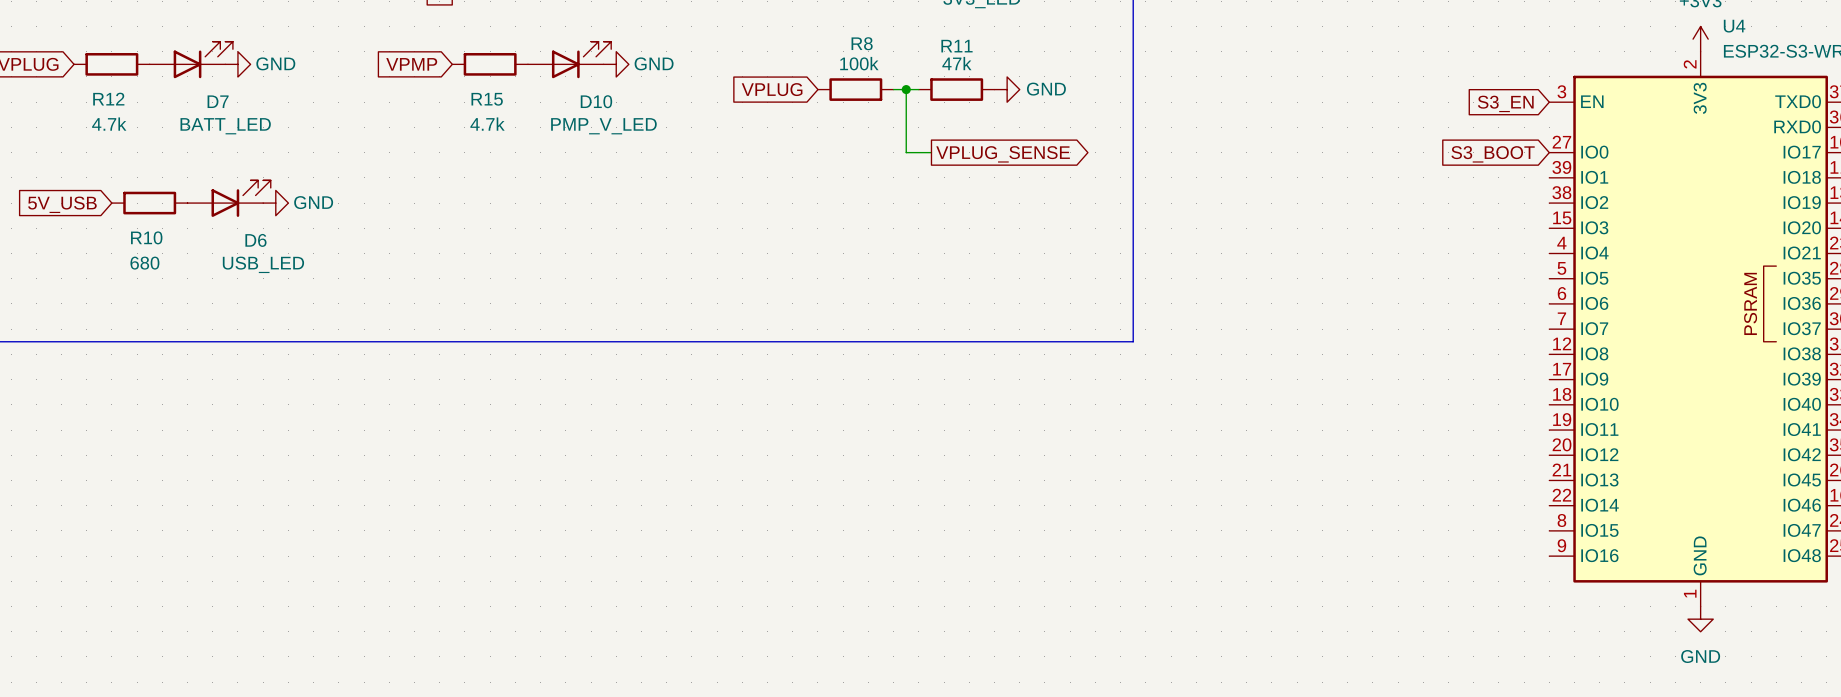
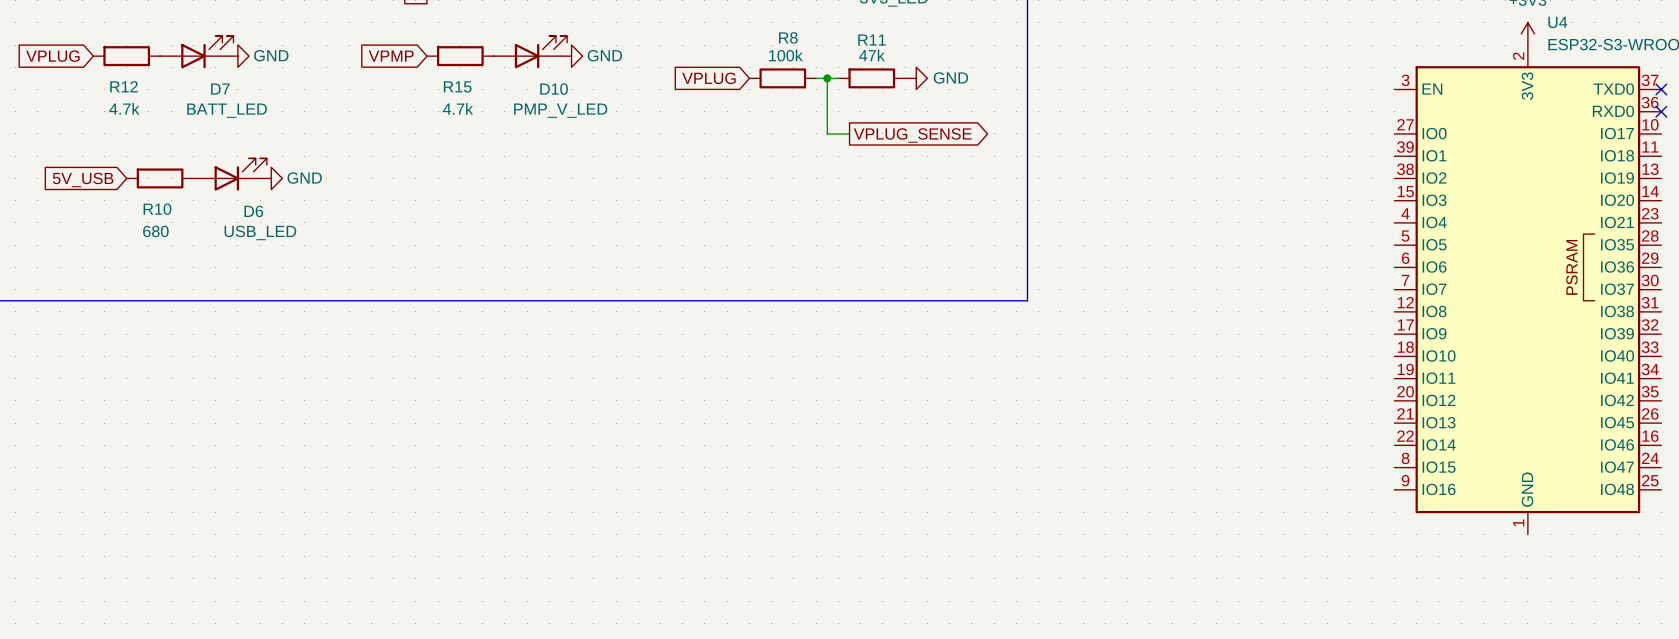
global label: S3_EN (1505, 103) -> none
global label: S3_BOOT (1493, 154) -> none
power symbol: GND (1700, 619) -> none

